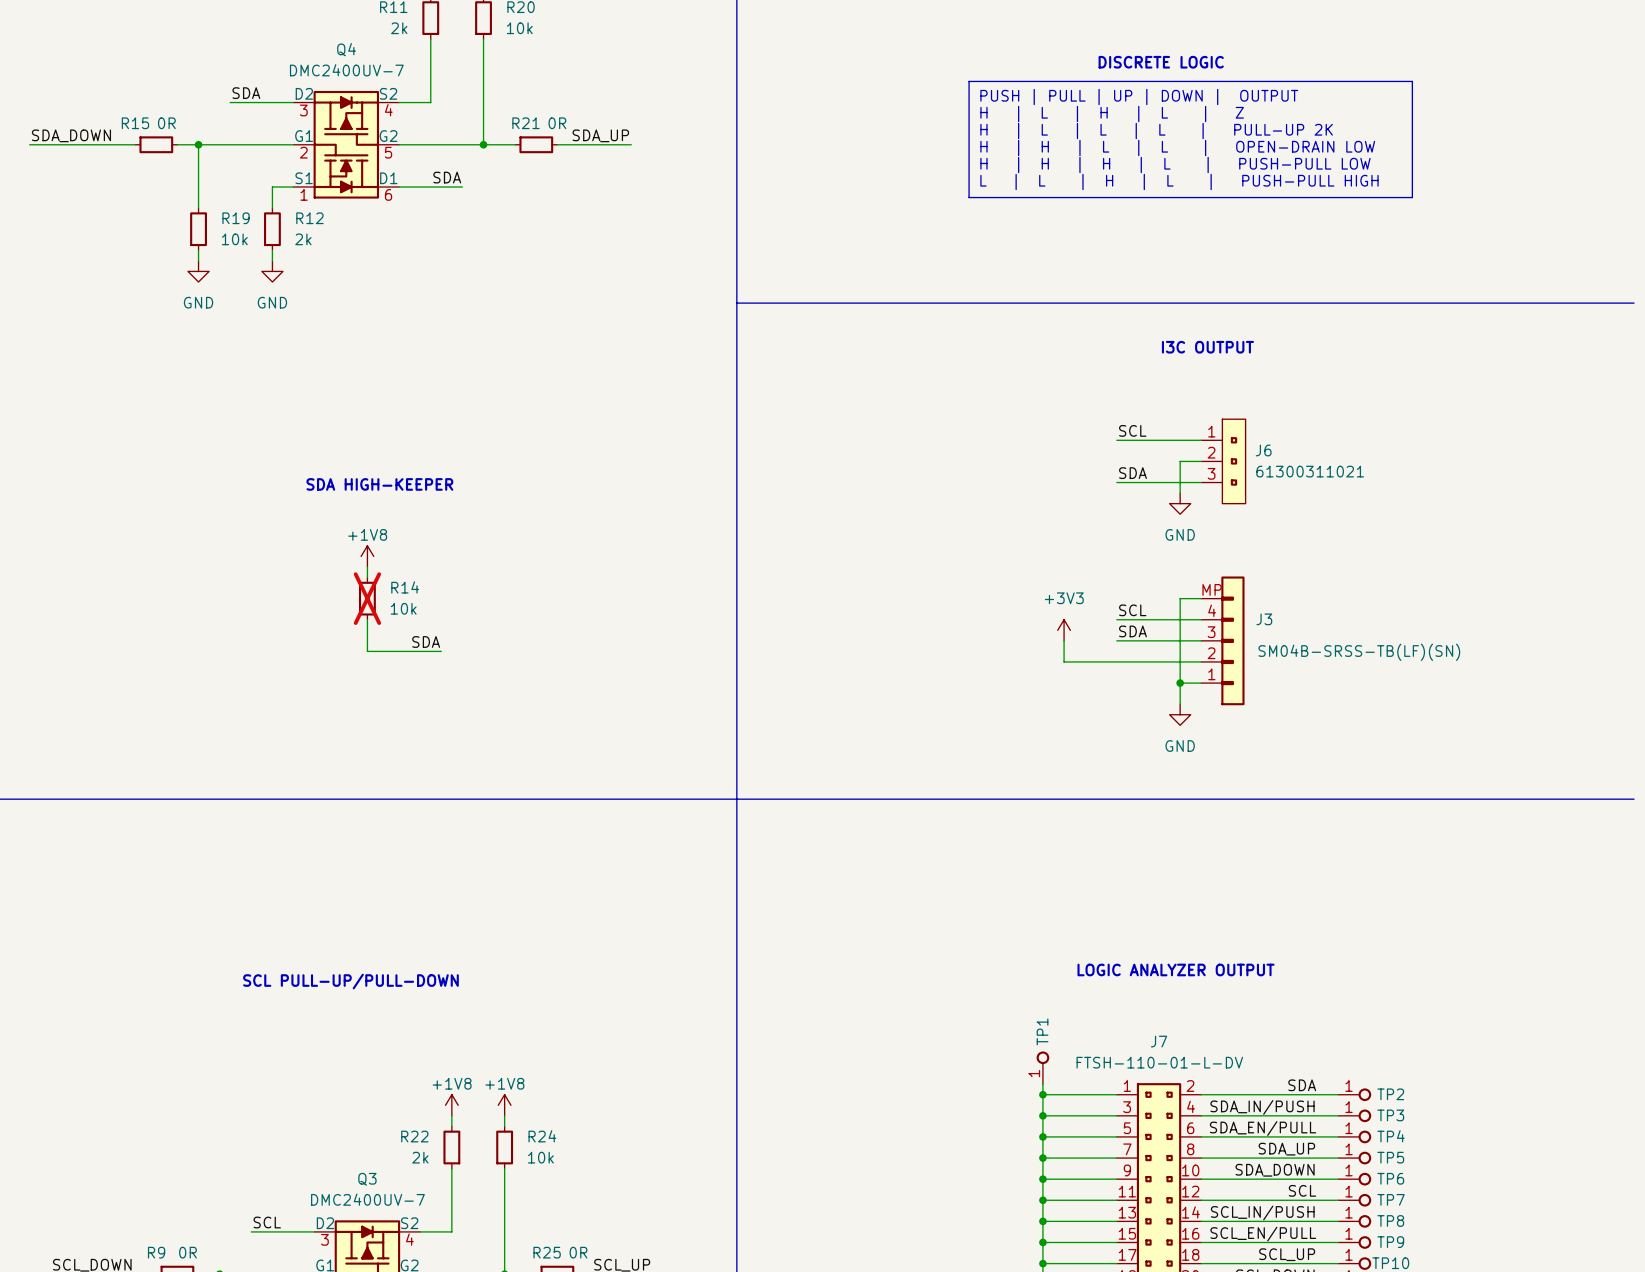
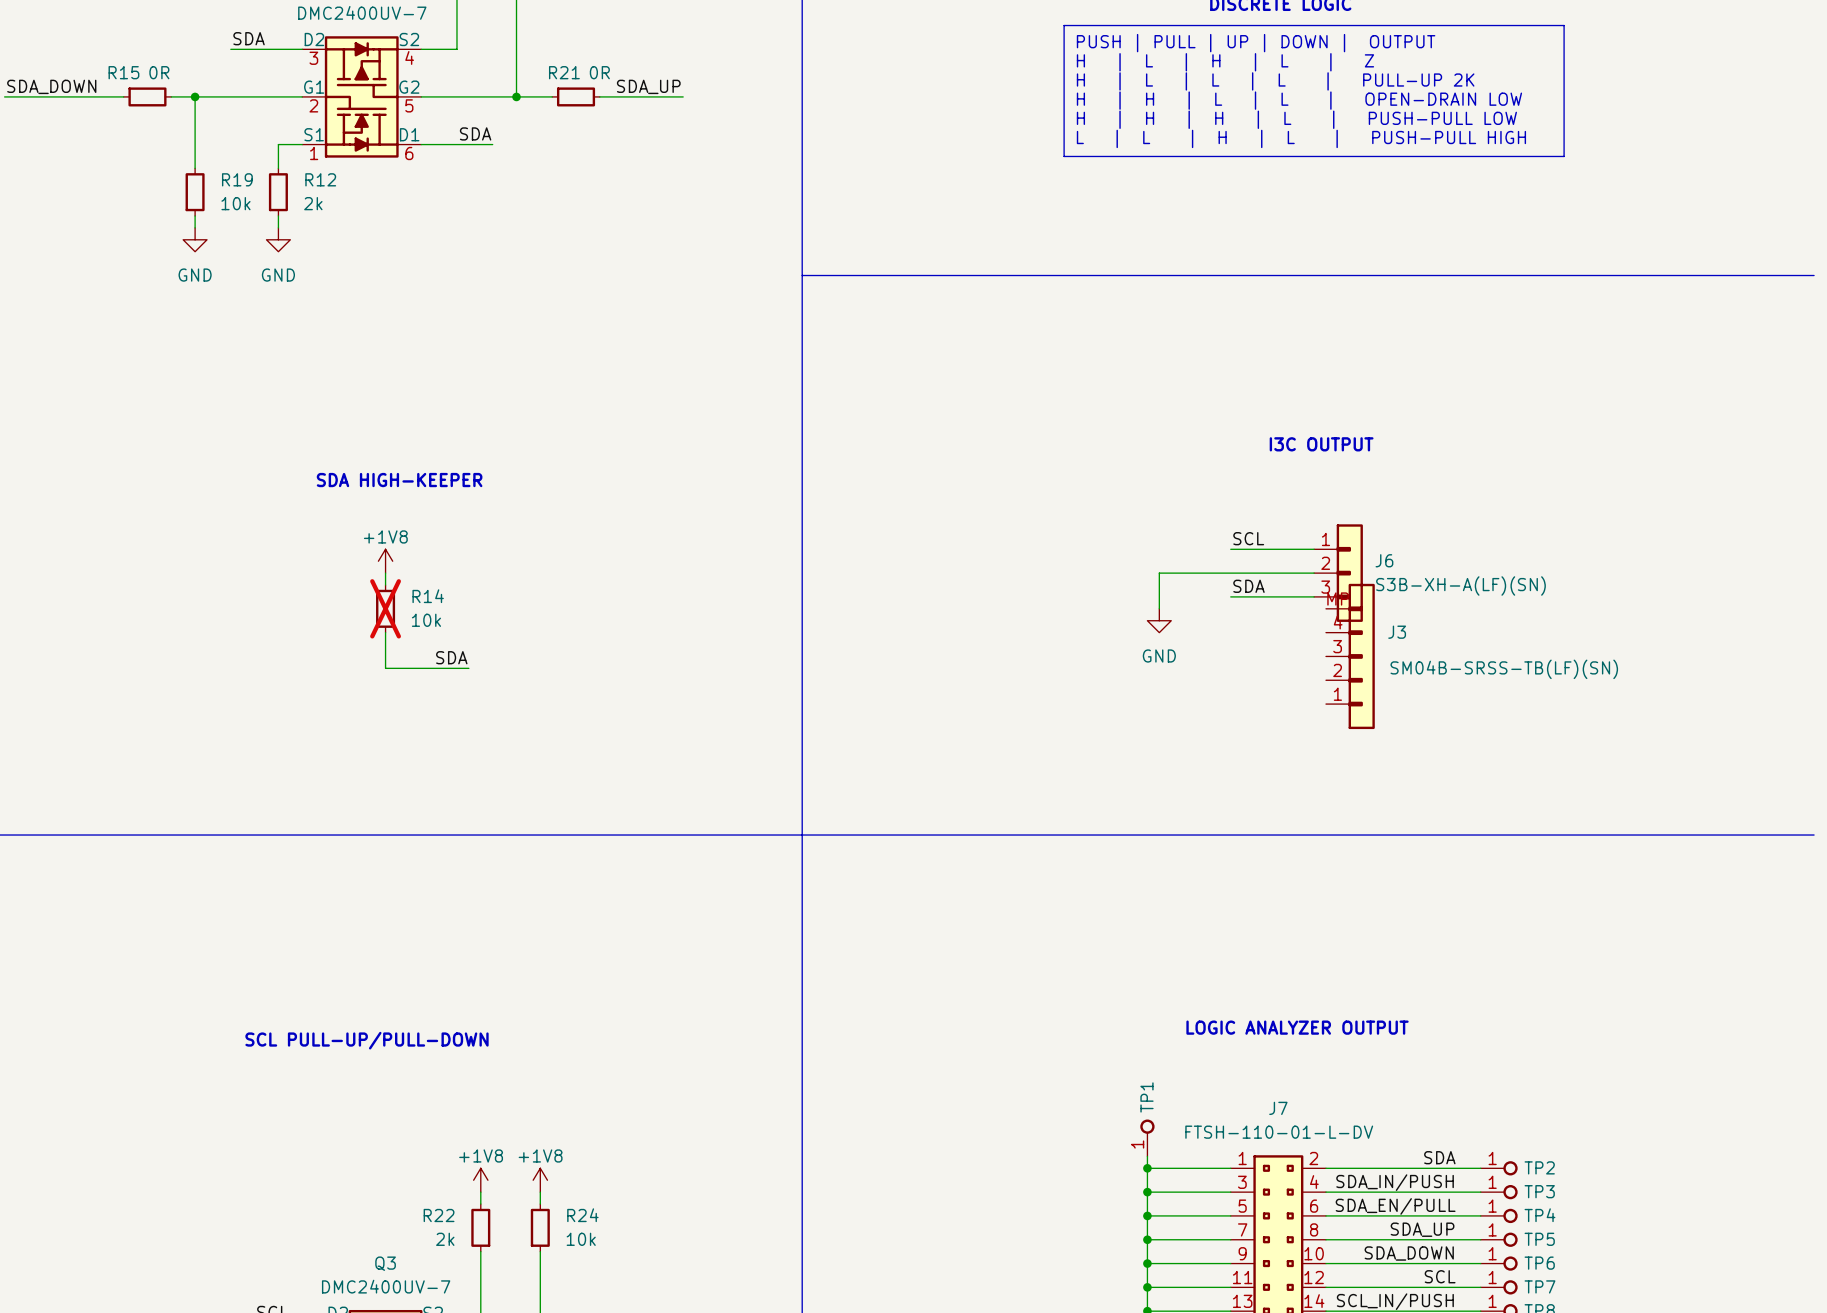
text position: I3C OUTPUT (1207, 347) -> I3C OUTPUT (1321, 444)
J6 symbol: [1201, 419, 1246, 504] -> [1314, 524, 1363, 622]
label: SCL (1132, 430) -> none
wire: (1116, 440) (1201, 440) -> none
wire: (1201, 461) (1180, 461) (1180, 493) -> none
J6 text: 61300311021 (1310, 471) -> S3B-XH-A(LF)(SN) (1460, 585)
label: SDA (1132, 473) -> none
wire: (1116, 482) (1201, 482) -> none
power symbol: GND (1180, 503) -> none
label: none -> SCL (1248, 538)
wire: none -> (1230, 549) (1314, 549)
wire: none -> (1314, 573) (1159, 573) (1159, 608)
label: none -> SDA (1248, 586)
wire: none -> (1230, 596) (1314, 596)
wire: (1201, 598) (1180, 598) (1180, 704) -> none
power symbol: none -> GND (1159, 620)
label: SCL (1132, 610) -> none
wire: (1116, 619) (1201, 619) -> none
power symbol: +3V3 (1064, 630) -> none
label: SDA (1132, 631) -> none
wire: (1064, 640) (1064, 661) (1201, 661) -> none
wire: (1116, 640) (1201, 640) -> none
wire: (1180, 683) (1201, 683) -> none
junction: (1180, 683) -> none
power symbol: GND (1180, 714) -> none

